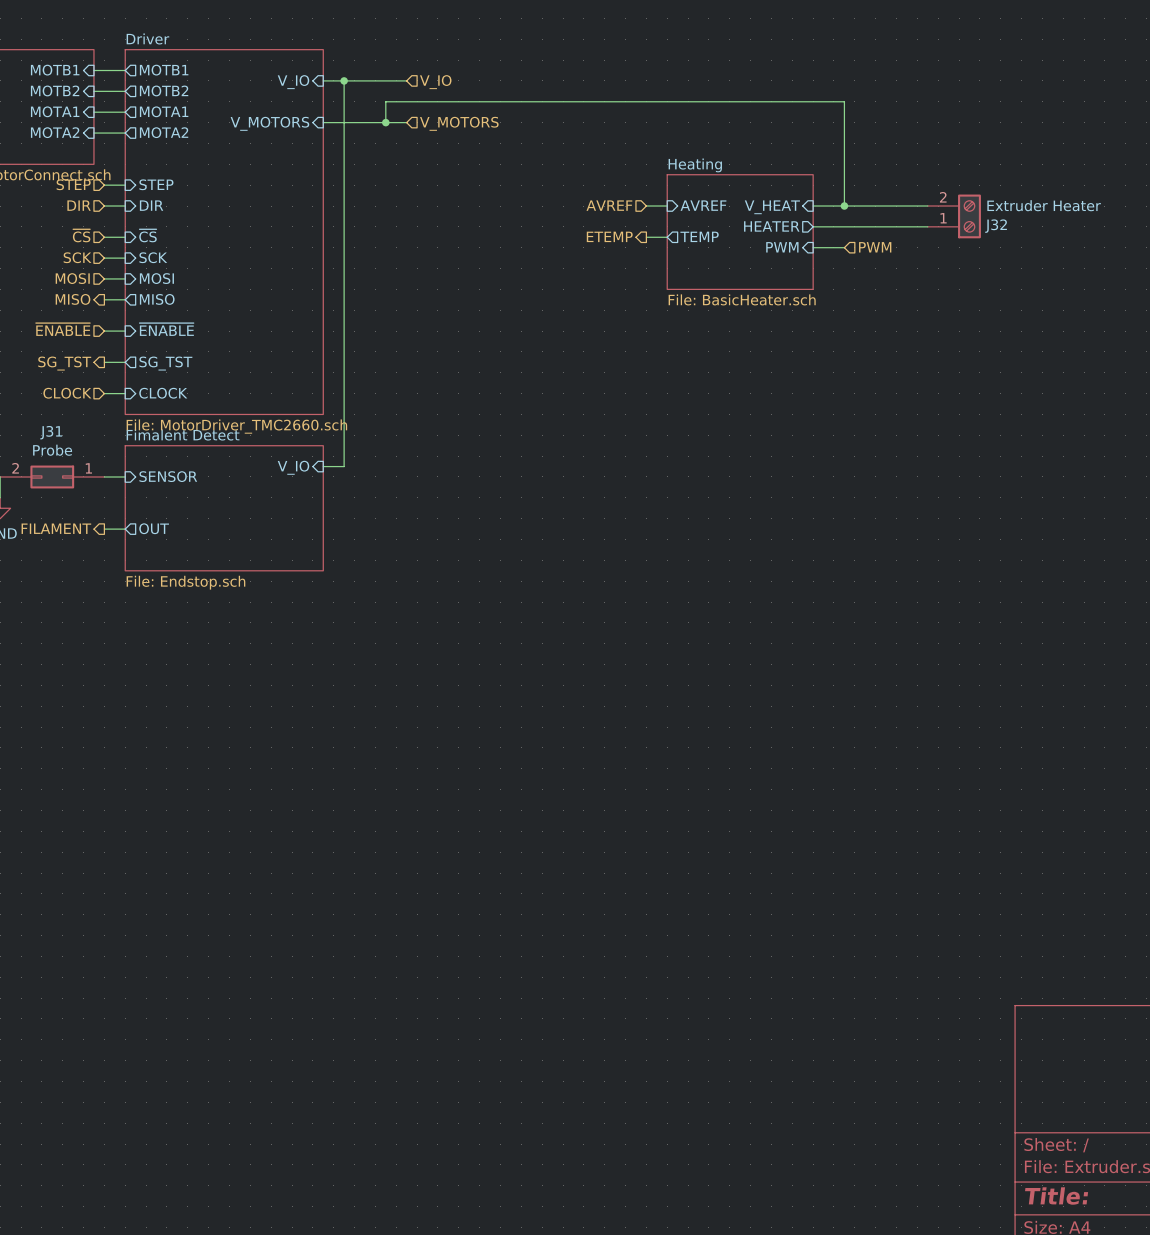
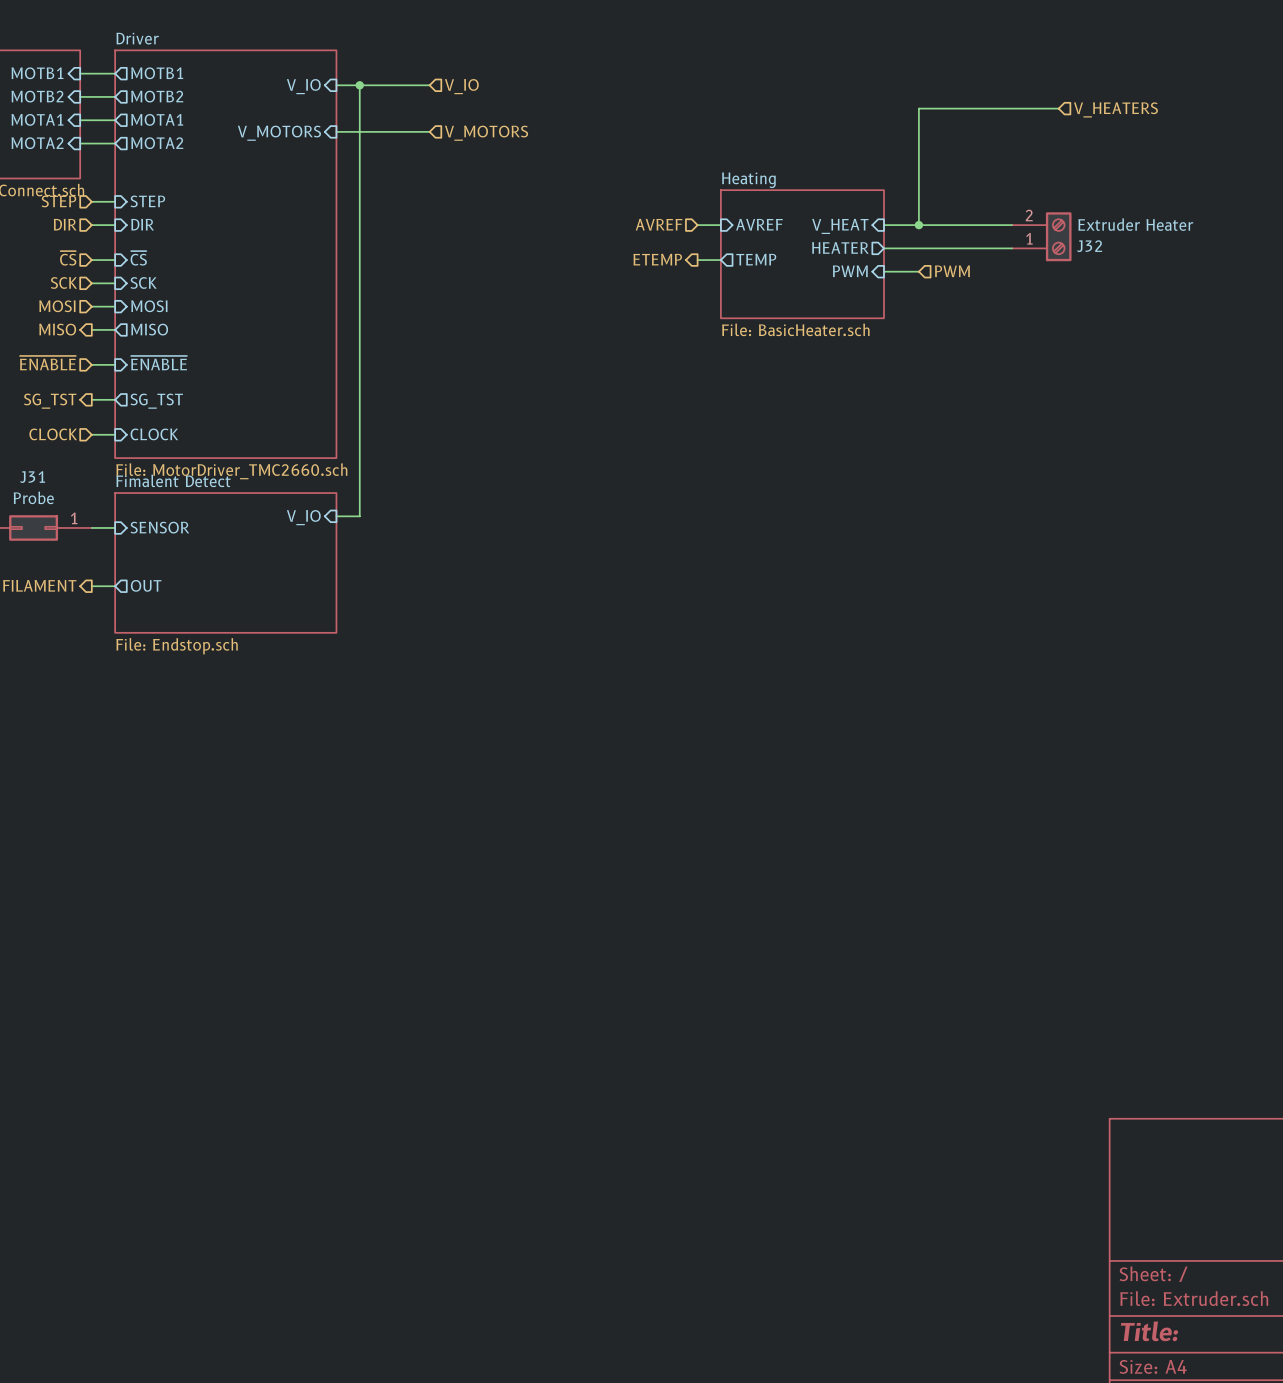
wire: (844, 101) (385, 101) (385, 122) -> (918, 108) (1058, 108)
hierarchical label: none -> V_HEATERS (1115, 109)
junction: (385, 122) -> none

